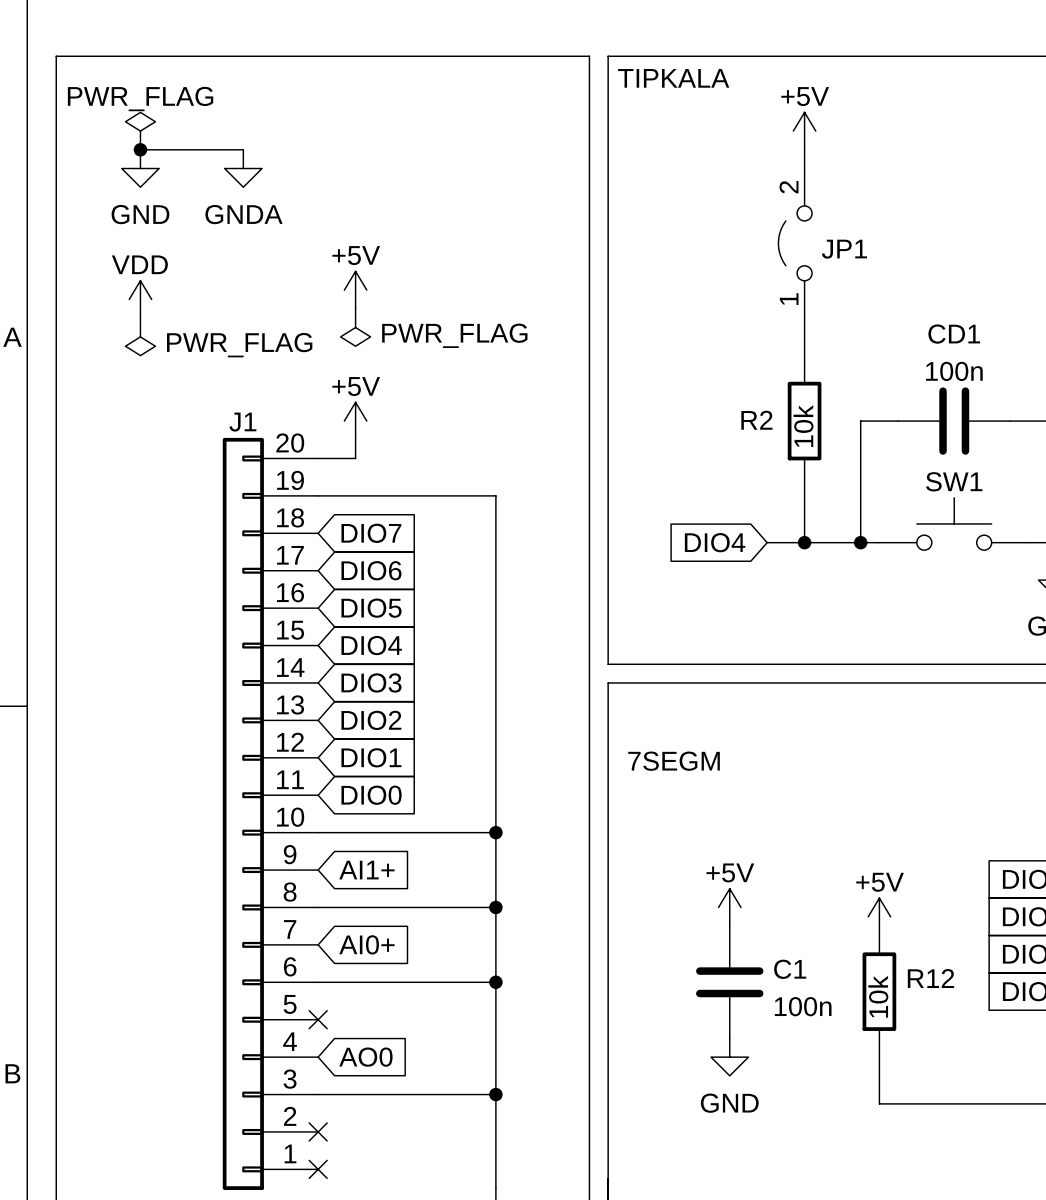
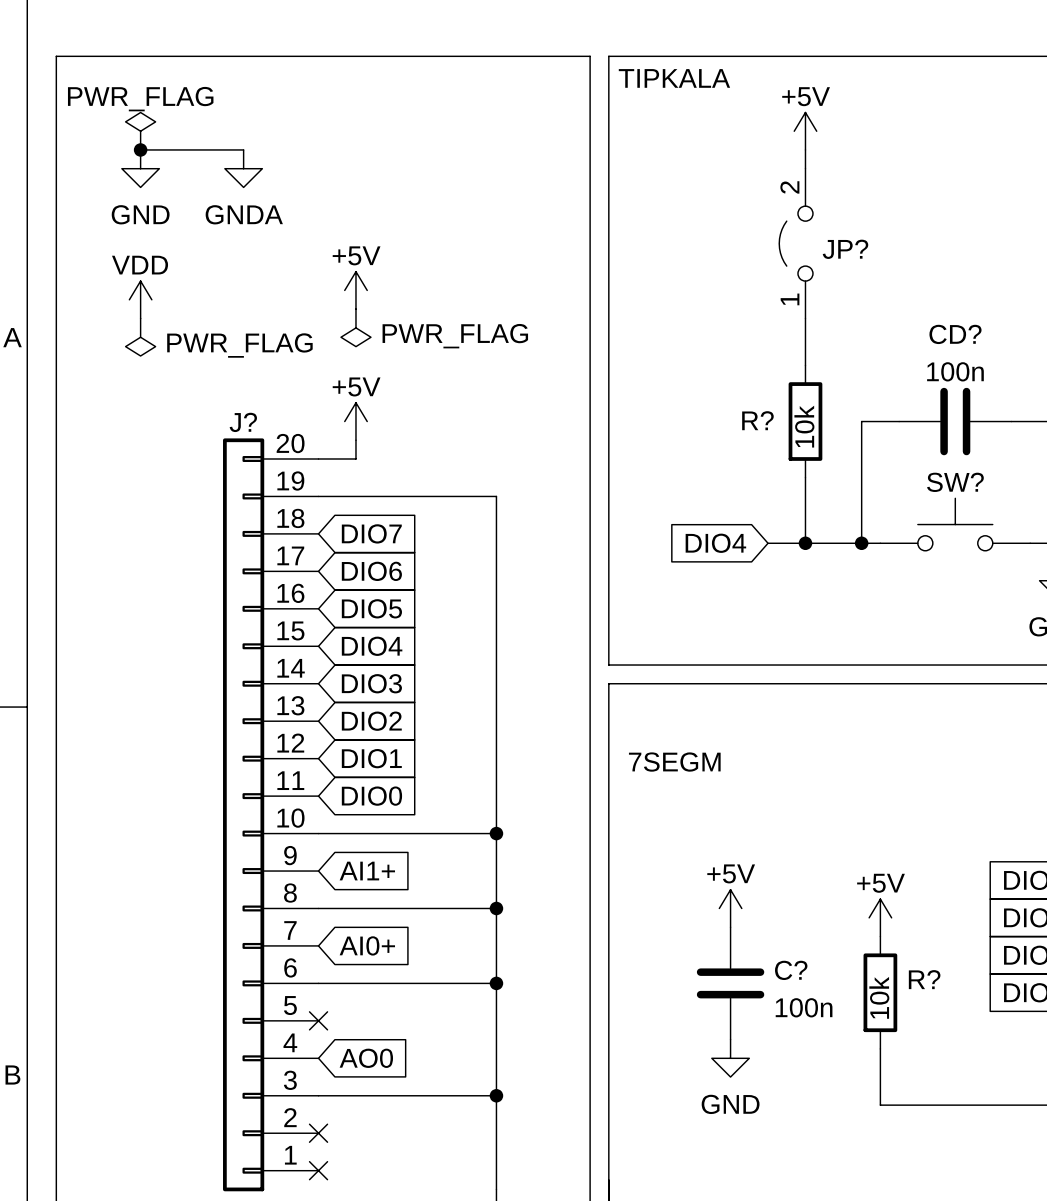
JP1 name: JP1 (844, 249) -> JP? (845, 249)
CD1 name: CD1 (954, 334) -> CD? (955, 334)
R2 name: R2 (756, 420) -> R? (757, 420)
J1 name: J1 (242, 422) -> J? (243, 422)
SW1 name: SW1 (954, 481) -> SW? (955, 482)
C1 name: C1 (790, 969) -> C? (791, 970)
R12 name: R12 (930, 978) -> R? (924, 979)

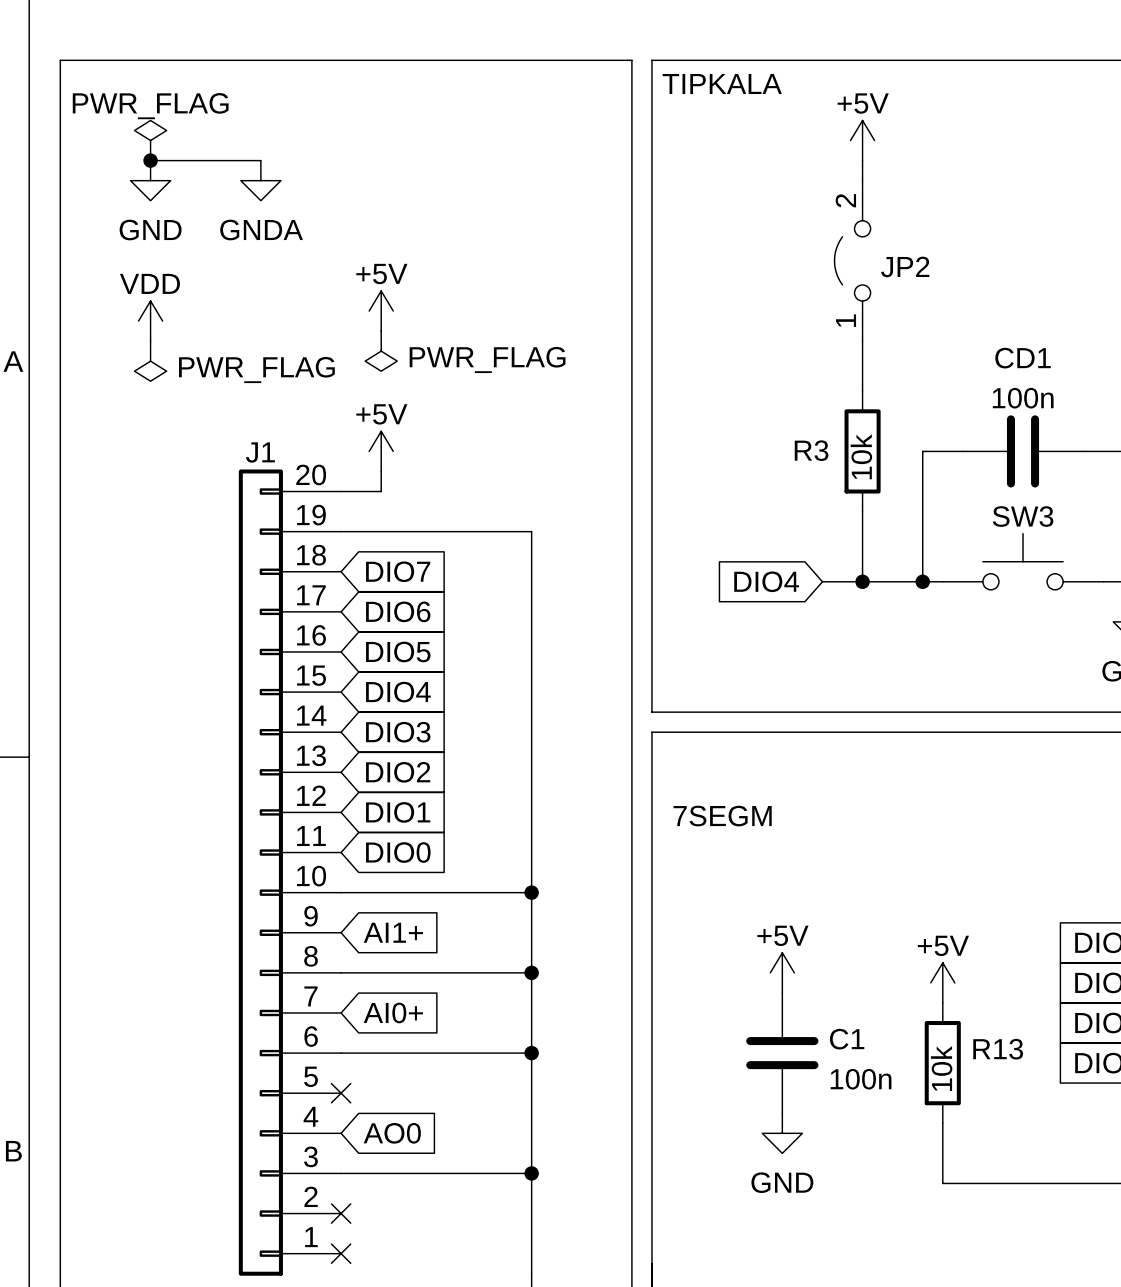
JP? name: JP? (845, 249) -> JP2 (905, 266)
CD? name: CD? (955, 334) -> CD1 (1023, 358)
R? name: R? (757, 420) -> R3 (811, 450)
J? name: J? (243, 422) -> J1 (260, 452)
SW? name: SW? (955, 482) -> SW3 (1023, 516)
C? name: C? (791, 970) -> C1 (847, 1039)
R? name: R? (924, 979) -> R13 (998, 1049)

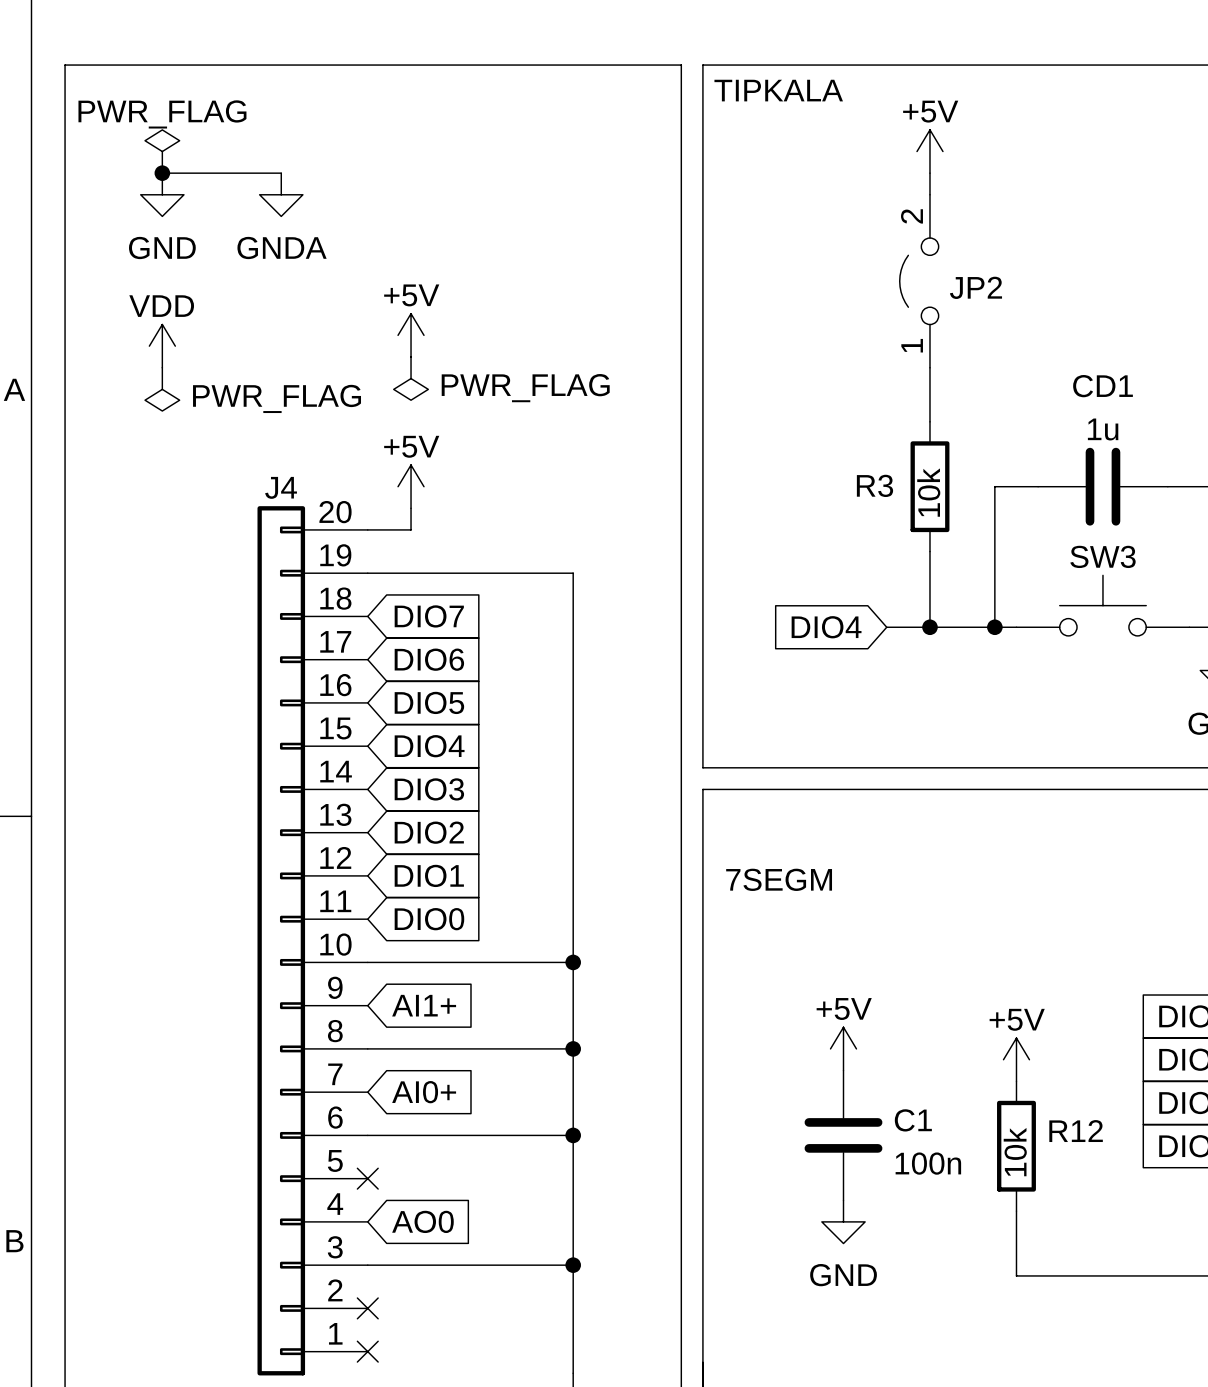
CD1 value: 100n (1023, 398) -> 1u (1103, 429)
J1 name: J1 (260, 452) -> J4 (281, 487)
R13 name: R13 (998, 1049) -> R12 (1076, 1131)

